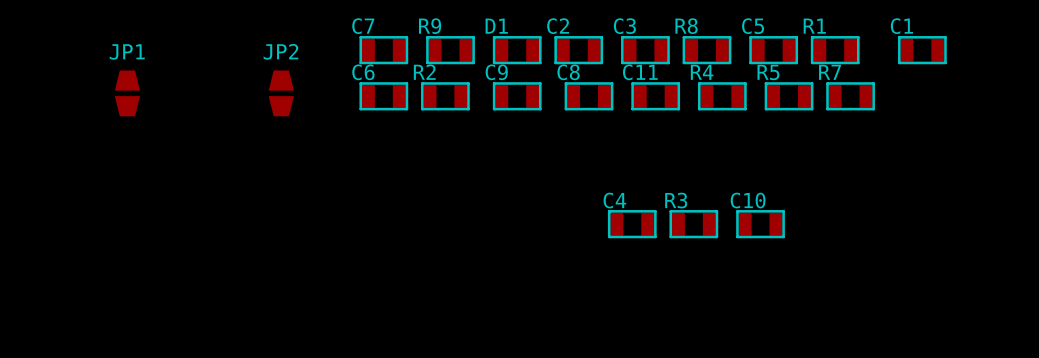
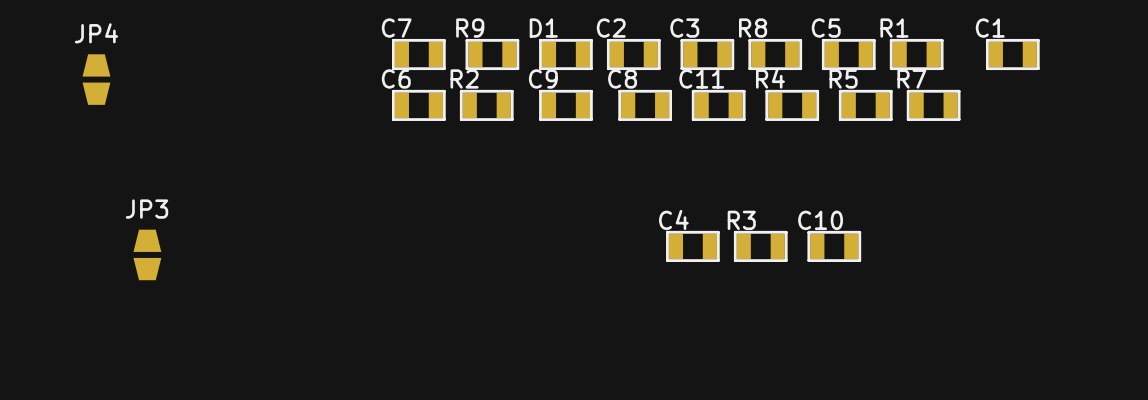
JP4: none -> (96, 79)
JP1: (127, 93) -> none
JP2: (281, 93) -> none
JP3: none -> (147, 254)

